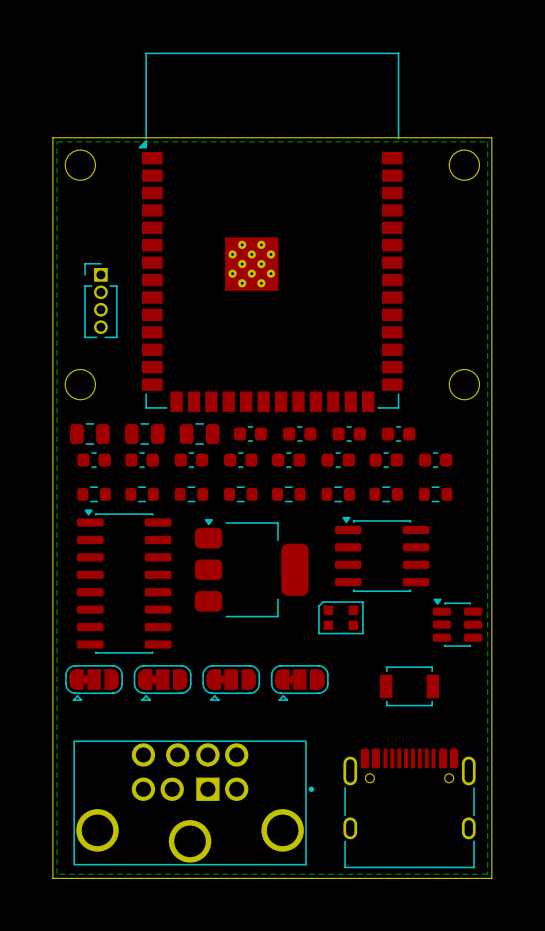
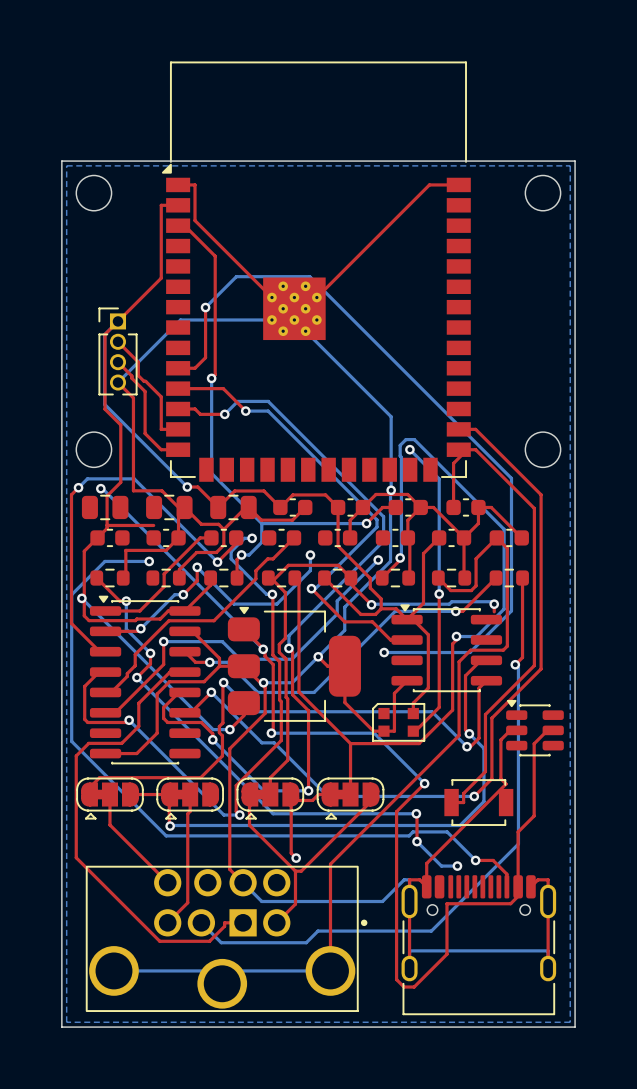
top track: none -> (178, 184) (195, 184) (195, 220) (271, 297)
top track: none -> (458, 184) (429, 184) (316, 297)
top track: none -> (178, 205) (161, 205) (161, 278) (105, 334) (105, 409) (120, 425) (120, 482) (107, 496) (107, 528) (84, 551) (84, 615) (89, 620) (160, 619) (168, 610) (184, 610) (210, 585) (210, 578)
top track: none -> (178, 225) (184, 225) (215, 256) (215, 374) (211, 378)
top track: none -> (205, 307) (205, 357) (195, 368) (178, 368)
bottom track: none -> (205, 307) (236, 276) (309, 276) (511, 478) (511, 610) (469, 652) (384, 652)
via: none -> (205, 307)
bottom track: none -> (271, 319) (180, 319) (117, 382)
bottom track: none -> (294, 319) (391, 416) (390, 561) (344, 607) (344, 630) (292, 682) (263, 682)
bottom track: none -> (117, 321) (104, 334) (104, 404) (187, 487)
top track: none -> (117, 341) (138, 362) (138, 375) (161, 396) (161, 429) (178, 429)
top track: none -> (117, 362) (145, 391) (145, 433) (161, 449) (178, 449)
bottom track: none -> (211, 378) (211, 473) (261, 523)
via: none -> (211, 378)
top track: none -> (117, 382) (133, 397) (133, 490) (161, 490) (180, 509)
top track: none -> (178, 388) (223, 388) (245, 411)
top track: none -> (178, 408) (195, 408) (200, 414) (224, 414)
bottom track: none -> (245, 411) (268, 411) (376, 519) (376, 527) (315, 588) (311, 588)
via: none -> (245, 411)
bottom track: none -> (224, 414) (237, 401) (268, 401) (383, 516) (383, 540) (288, 635) (288, 648)
via: none -> (224, 414)
top track: none -> (458, 429) (475, 429) (541, 494) (541, 668) (491, 718) (491, 778) (474, 796)
bottom track: none -> (409, 449) (439, 478) (439, 594)
via: none -> (409, 449)
top track: none -> (458, 449) (475, 449) (534, 508) (534, 665) (485, 714) (485, 771) (463, 793) (463, 802) (451, 802)
top track: none -> (467, 449) (453, 463) (453, 507)
top track: none -> (187, 487) (197, 487) (218, 507) (234, 490) (263, 490) (280, 507) (292, 494) (325, 494) (338, 507) (338, 546) (370, 578) (370, 587) (381, 598) (381, 608)
via: none -> (187, 487)
top track: none -> (78, 487) (71, 494) (71, 623) (99, 651) (105, 651)
bottom track: none -> (78, 487) (87, 478) (134, 478) (217, 562)
via: none -> (78, 487)
bottom track: none -> (100, 488) (263, 649)
via: none -> (100, 488)
via: none -> (391, 490)
top track: none -> (305, 507) (292, 520) (261, 520) (248, 507) (245, 507) (223, 529)
top track: none -> (395, 507) (382, 507) (366, 523)
top track: none -> (420, 507) (433, 507) (464, 537)
top track: none -> (420, 507) (407, 520) (407, 537) (409, 539) (408, 578)
top track: none -> (420, 507) (407, 494) (375, 494) (350, 520) (350, 537)
bottom track: none -> (261, 523) (261, 542) (249, 554) (241, 554)
bottom track: none -> (261, 523) (366, 523)
via: none -> (366, 523)
top track: none -> (107, 525) (153, 525)
top track: none -> (223, 529) (223, 545) (216, 552) (196, 552) (179, 569) (179, 578)
top track: none -> (223, 529) (218, 524) (201, 524) (182, 507) (178, 511) (178, 537) (166, 550) (125, 550) (125, 575) (123, 578)
top track: none -> (211, 537) (200, 537) (164, 574) (164, 586) (139, 610) (105, 610)
top track: none -> (236, 537) (236, 543) (217, 562)
bottom track: none -> (252, 538) (244, 538) (231, 551) (231, 558) (266, 594) (272, 594)
via: none -> (252, 538)
top track: none -> (294, 537) (273, 558) (267, 558) (255, 570) (255, 578) (213, 620) (168, 620) (135, 654) (135, 665) (127, 673) (127, 676) (111, 692) (105, 692)
top track: none -> (439, 537) (423, 553) (423, 603) (407, 619) (396, 608) (381, 608)
top track: none -> (464, 537) (478, 523) (478, 507) (491, 507) (521, 537)
top track: none -> (464, 537) (464, 578)
top track: none -> (241, 554) (237, 559) (237, 578)
via: none -> (241, 554)
bottom track: none -> (310, 555) (310, 570) (276, 604) (233, 604) (197, 567)
via: none -> (310, 555)
top track: none -> (400, 557) (382, 578)
bottom track: none -> (400, 557) (400, 445) (405, 439) (414, 439) (504, 529) (504, 609) (476, 636) (456, 636)
via: none -> (400, 557)
bottom track: none -> (378, 560) (337, 601) (337, 614) (291, 659) (240, 659) (222, 641) (163, 641)
via: none -> (378, 560)
bottom track: none -> (149, 561) (104, 561) (71, 594) (71, 741) (166, 835) (409, 835) (413, 831) (447, 831) (475, 860)
via: none -> (149, 561)
via: none -> (217, 562)
top track: none -> (197, 567) (197, 580) (183, 594)
via: none -> (197, 567)
top track: none -> (96, 578) (119, 601) (126, 601)
top track: none -> (294, 578) (298, 582) (298, 692) (350, 743)
top track: none -> (324, 578) (360, 614) (375, 614) (381, 608)
top track: none -> (438, 578) (450, 590) (471, 590) (476, 585) (476, 558) (496, 537) (507, 548) (507, 646) (503, 650) (470, 650) (459, 661) (459, 735) (330, 864) (330, 970)
top track: none -> (496, 578) (462, 611) (455, 611)
top track: none -> (522, 578) (522, 657) (515, 664)
top track: none -> (273, 580) (285, 592) (285, 638) (279, 644) (279, 652) (286, 659) (287, 760) (270, 777) (270, 794)
top track: none -> (273, 580) (288, 565) (338, 565) (350, 578) (350, 584) (371, 604)
top track: none -> (311, 588) (344, 621) (372, 621) (390, 640) (407, 640)
via: none -> (311, 588)
bottom track: none -> (183, 594) (174, 594) (140, 628)
via: none -> (183, 594)
top track: none -> (272, 594) (272, 655) (279, 661) (281, 740) (236, 785) (236, 811) (239, 815)
via: none -> (272, 594)
top track: none -> (439, 594) (439, 707) (413, 731)
via: none -> (439, 594)
bottom track: none -> (81, 598) (213, 729) (229, 729)
via: none -> (81, 598)
bottom track: none -> (126, 601) (126, 629) (150, 653)
via: none -> (126, 601)
top track: none -> (494, 604) (494, 611)
bottom track: none -> (494, 604) (491, 601) (451, 601) (449, 604) (371, 604)
via: none -> (494, 604)
via: none -> (371, 604)
bottom track: none -> (455, 611) (395, 611) (314, 692) (257, 692) (227, 662) (209, 662)
via: none -> (455, 611)
top track: none -> (410, 616) (428, 634) (428, 688) (413, 703) (413, 713)
top track: none -> (140, 628) (138, 631) (105, 631)
via: none -> (140, 628)
top track: none -> (243, 629) (263, 648) (265, 656) (273, 664) (273, 731) (271, 733)
top track: none -> (184, 631) (192, 631) (219, 658) (219, 666) (204, 681) (169, 681) (157, 694) (157, 733) (136, 753) (105, 753)
top track: none -> (456, 636) (456, 640) (452, 643) (452, 710) (419, 743) (350, 743)
via: none -> (456, 636)
top track: none -> (163, 641) (163, 664) (115, 712) (105, 712)
via: none -> (163, 641)
top track: none -> (288, 648) (292, 651) (292, 694) (308, 710) (308, 790)
via: none -> (288, 648)
via: none -> (263, 649)
top track: none -> (184, 651) (195, 662) (209, 662)
top track: none -> (150, 653) (150, 664) (136, 677)
via: none -> (150, 653)
via: none -> (384, 652)
top track: none -> (318, 656) (327, 666) (344, 666) (344, 702) (373, 731) (394, 731) (394, 693) (407, 680)
via: none -> (318, 656)
top track: none -> (486, 660) (480, 660) (465, 675) (465, 730) (469, 733)
via: none -> (209, 662)
bottom track: none -> (515, 664) (518, 667) (518, 844) (431, 931) (317, 931) (306, 942) (221, 942) (201, 922)
via: none -> (515, 664)
top track: none -> (219, 666) (243, 666) (265, 687) (265, 713) (229, 748) (229, 869) (243, 882)
top track: none -> (105, 672) (99, 672) (84, 686) (84, 719) (87, 722) (126, 722) (129, 720)
top track: none -> (184, 672) (170, 672) (138, 703) (138, 726) (121, 743) (88, 743) (76, 755) (76, 857) (159, 941) (209, 941) (224, 926) (224, 922) (243, 922)
bottom track: none -> (136, 677) (273, 813) (416, 813)
via: none -> (136, 677)
top track: none -> (486, 680) (479, 688) (479, 738) (470, 746) (467, 746)
top track: none -> (223, 682) (222, 722) (219, 726) (219, 732) (222, 735) (222, 755) (200, 777) (99, 777) (89, 788) (89, 794)
bottom track: none -> (223, 682) (252, 711) (432, 711) (467, 746)
via: none -> (223, 682)
via: none -> (263, 682)
top track: none -> (184, 692) (178, 692) (163, 707) (163, 718) (167, 722) (201, 722) (212, 733) (212, 739)
top track: none -> (211, 692) (190, 712) (184, 712)
bottom track: none -> (211, 692) (261, 742) (274, 742) (327, 796) (474, 796)
via: none -> (211, 692)
top track: none -> (243, 703) (243, 715) (229, 729)
bottom track: none -> (129, 720) (223, 815) (239, 815)
via: none -> (129, 720)
via: none -> (229, 729)
top track: none -> (516, 730) (510, 730) (500, 739) (500, 778) (506, 784) (426, 863) (426, 886) (419, 879) (409, 879) (409, 968)
top track: none -> (553, 730) (547, 730) (534, 743) (534, 815) (518, 832) (518, 896) (510, 903) (446, 903) (446, 954) (414, 987) (403, 987) (396, 979) (396, 811) (424, 783)
bottom track: none -> (271, 733) (374, 733) (424, 783)
via: none -> (271, 733)
bottom track: none -> (469, 733) (483, 748) (483, 801) (459, 825) (170, 826)
via: none -> (469, 733)
bottom track: none -> (212, 739) (263, 790) (308, 790)
via: none -> (212, 739)
top track: none -> (350, 743) (350, 794)
via: none -> (467, 746)
via: none -> (424, 783)
via: none -> (308, 790)
top track: none -> (109, 794) (109, 825) (167, 882)
top track: none -> (130, 794) (169, 794) (170, 826)
top track: none -> (190, 794) (190, 811) (187, 813) (187, 902) (167, 922)
top track: none -> (249, 794) (249, 825) (295, 871)
top track: none -> (329, 794) (318, 794) (312, 800) (297, 800) (291, 794) (291, 853) (296, 858)
top track: none -> (371, 794) (371, 801) (301, 871) (295, 871)
via: none -> (474, 796)
top track: none -> (416, 813) (417, 841)
via: none -> (416, 813)
via: none -> (239, 815)
via: none -> (170, 826)
bottom track: none -> (417, 841) (441, 866) (457, 866)
via: none -> (417, 841)
via: none -> (296, 858)
top track: none -> (475, 860) (493, 860) (506, 874) (506, 886)
via: none -> (475, 860)
via: none -> (457, 866)
top track: none -> (295, 871) (295, 904) (276, 922)
bottom track: none -> (243, 882) (261, 901) (382, 901) (404, 879) (409, 879) (409, 901)
top track: none -> (530, 886) (537, 879) (548, 879) (548, 968)
bottom track: none -> (409, 968) (409, 950) (548, 950) (548, 968)
bottom track: none -> (113, 970) (209, 970) (222, 983) (235, 970) (330, 970)

